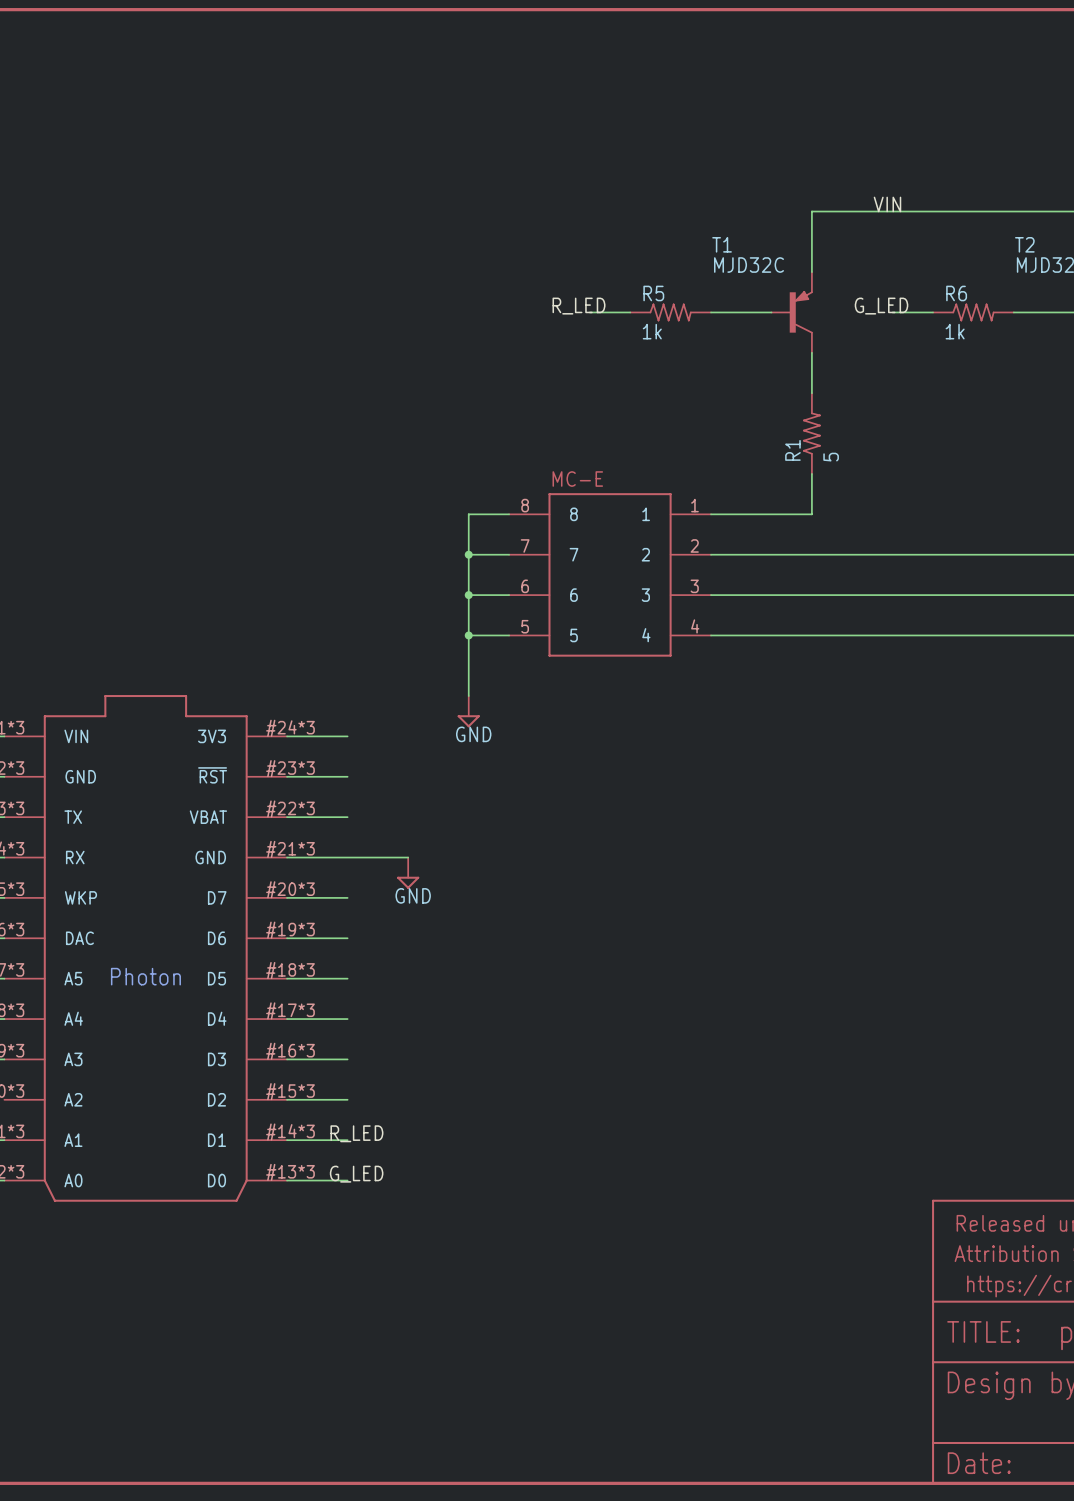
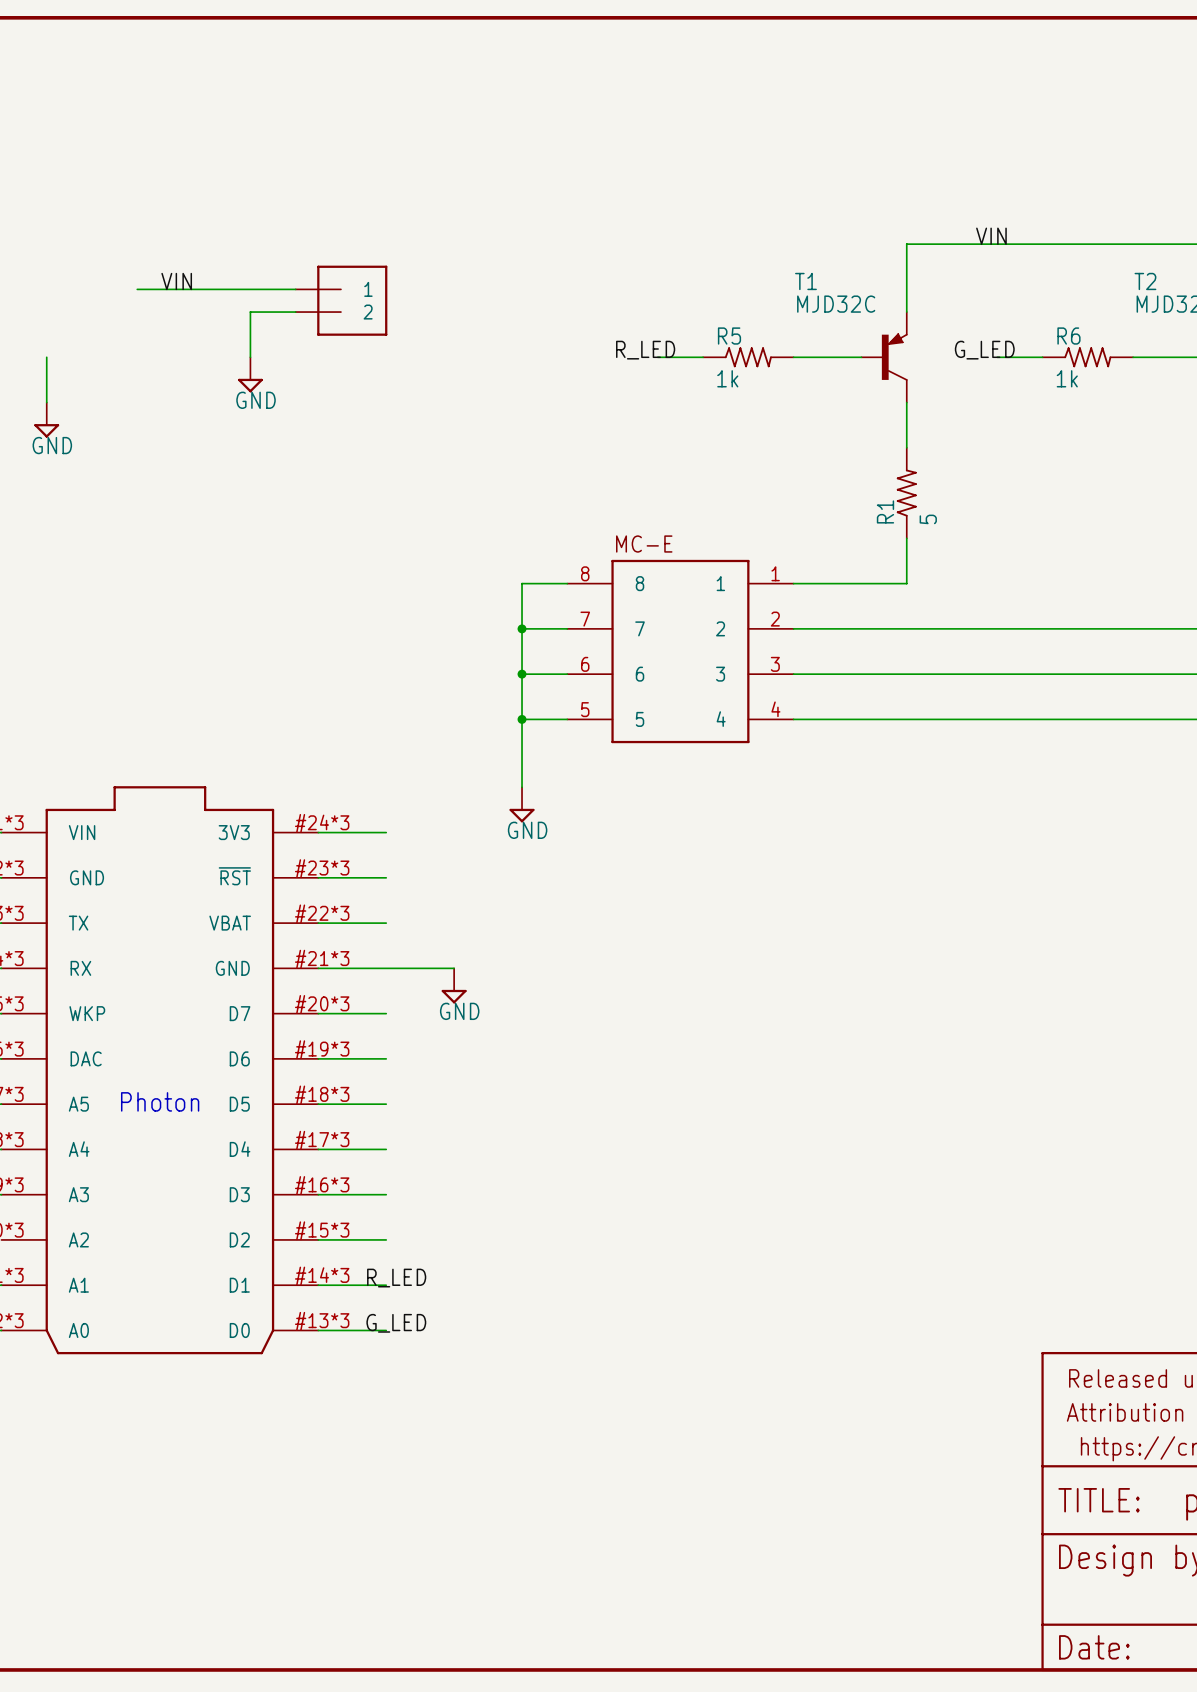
label: none -> VIN (176, 281)
wire: none -> (137, 289) (295, 289)
part: none -> (341, 300)
wire: none -> (295, 312) (250, 312) (250, 357)
wire: none -> (46, 357) (46, 402)
power symbol: none -> GND (250, 374)
power symbol: none -> GND (46, 420)

